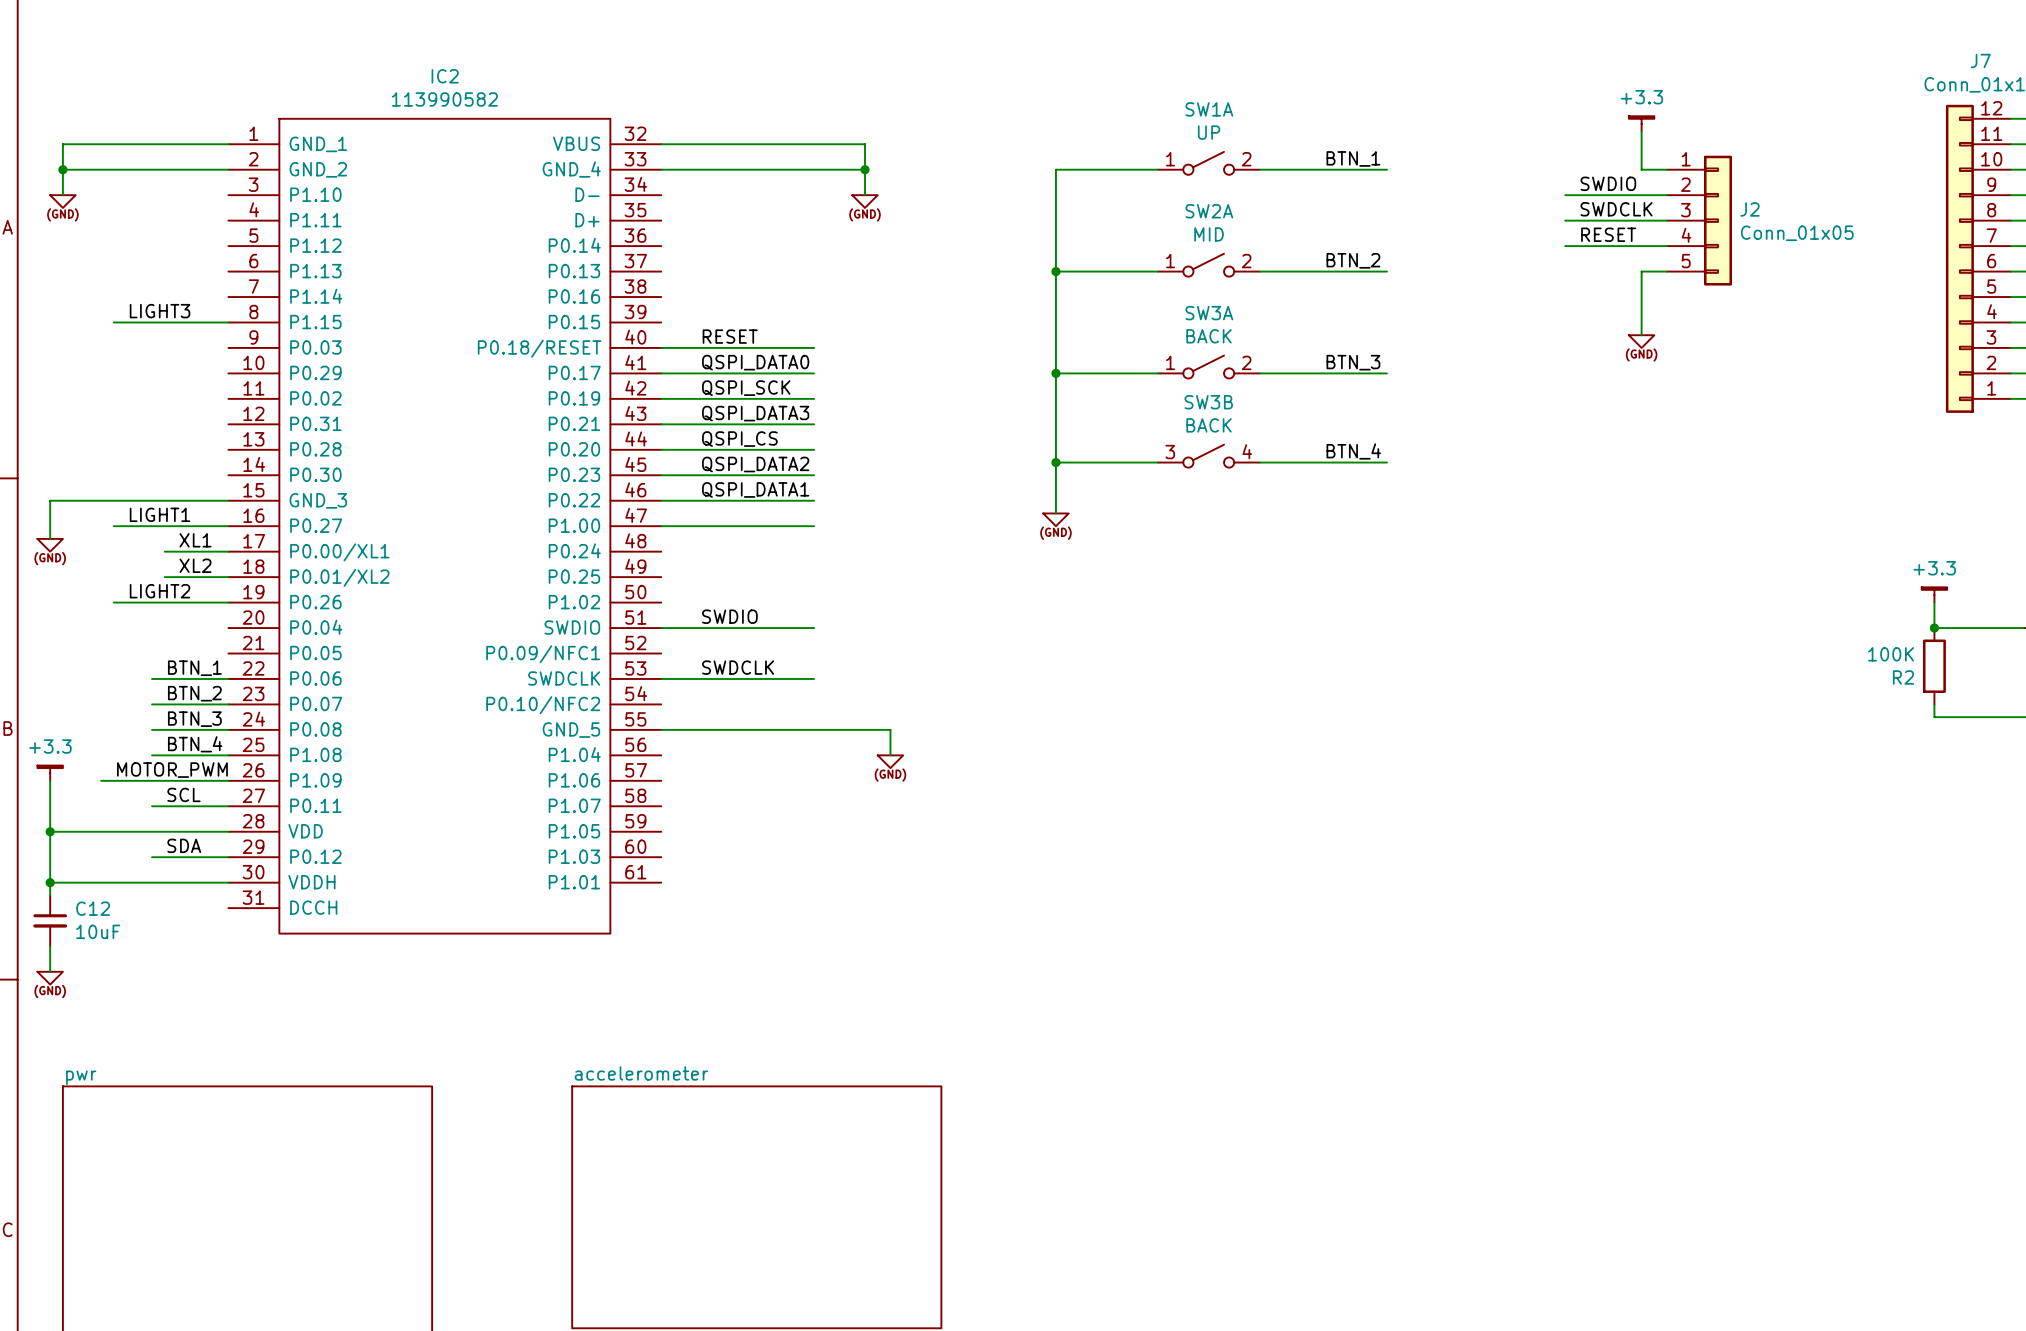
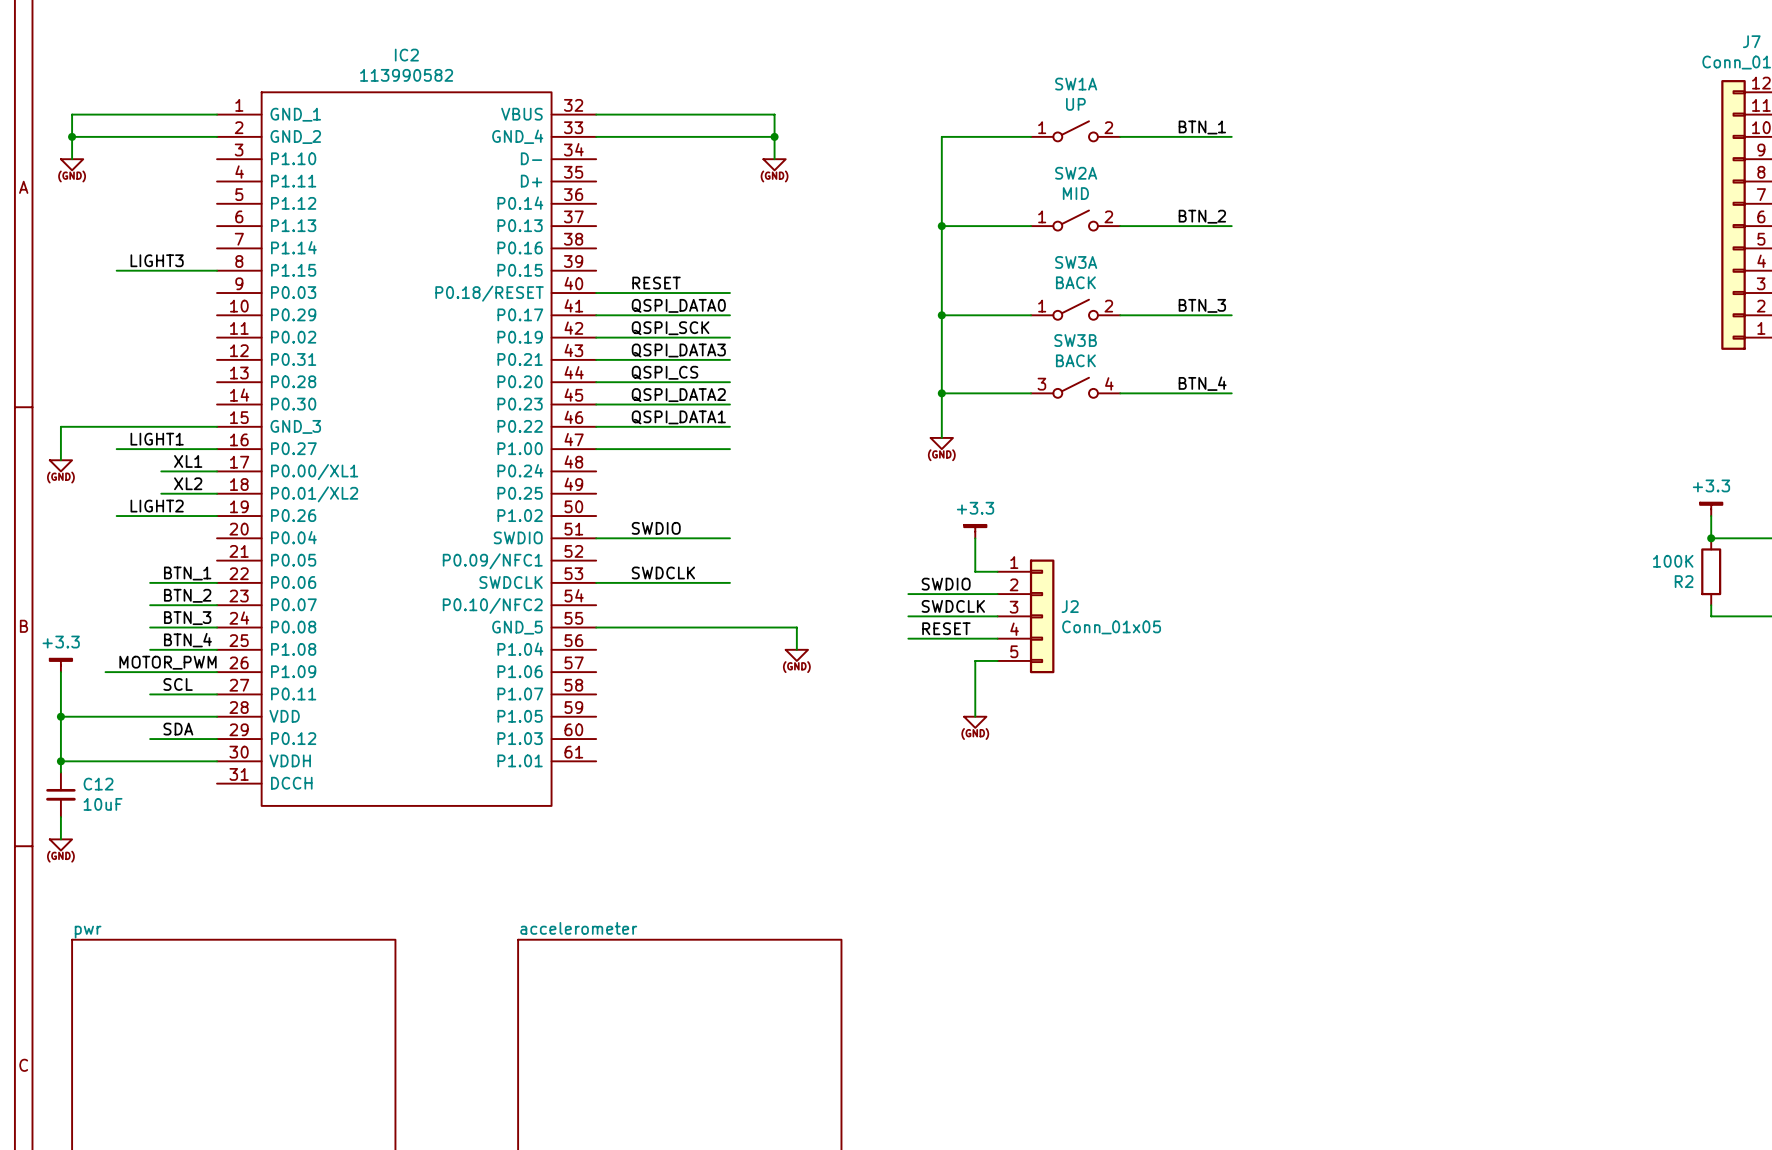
power symbol: +3.3 (1641, 123) -> none
wire: (1641, 131) (1641, 169) (1667, 169) -> none
label: SWDIO (1608, 183) -> none
wire: (1565, 195) (1667, 195) -> none
label: SWDCLK (1616, 209) -> none
wire: (1565, 220) (1667, 220) -> none
J2 position: (1699, 220) -> (1026, 616)
label: RESET (1608, 234) -> none
wire: (1565, 246) (1667, 246) -> none
wire: (1667, 271) (1641, 271) (1641, 335) -> none
power symbol: (1641, 341) -> none
power symbol: none -> +3.3 (975, 531)
wire: none -> (975, 538) (975, 571) (997, 571)
label: none -> SWDIO (946, 584)
wire: none -> (908, 594) (997, 594)
label: none -> SWDCLK (953, 606)
wire: none -> (908, 616) (997, 616)
label: none -> RESET (946, 628)
wire: none -> (908, 638) (997, 638)
wire: none -> (997, 660) (975, 660) (975, 716)
power symbol: none -> (975, 722)

